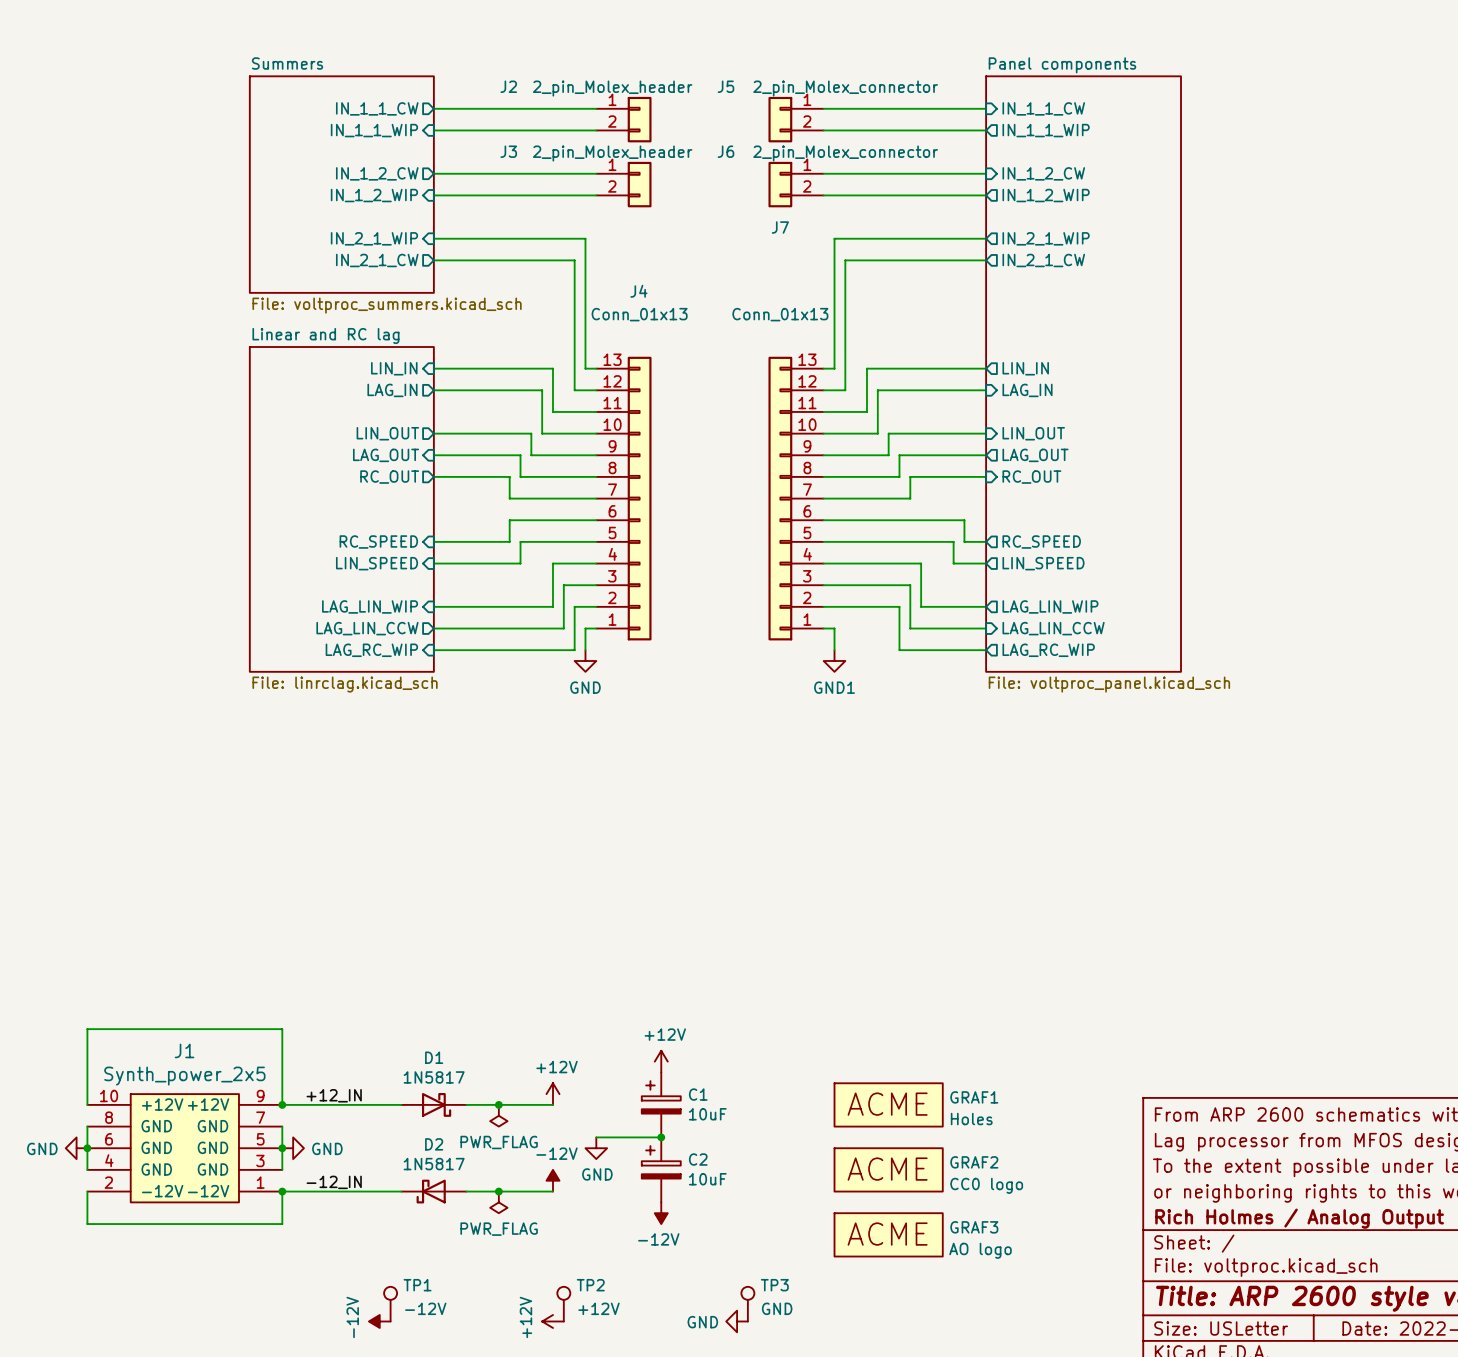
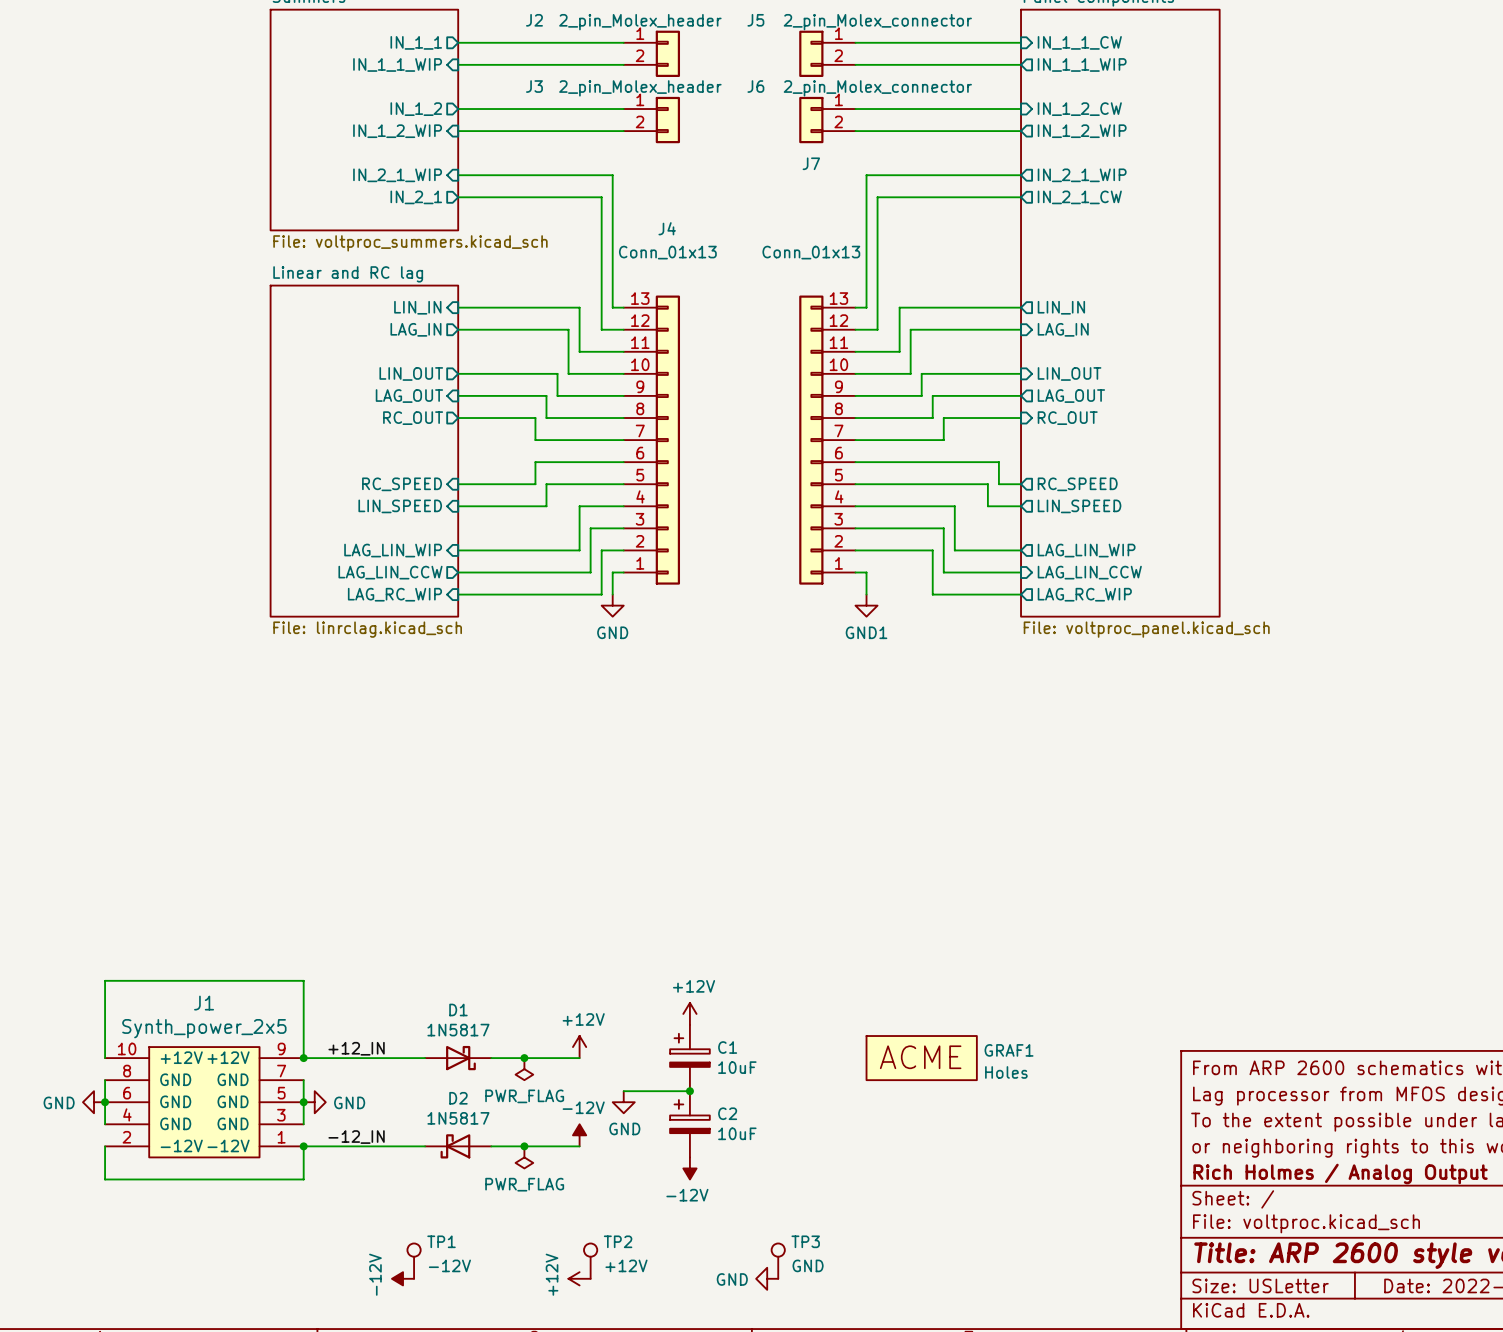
sheet pin: IN_1_1_CW (377, 108) -> IN_1_1 (416, 42)
sheet pin: IN_1_2_CW (377, 173) -> IN_1_2 (416, 109)
sheet pin: IN_2_1_CW (377, 260) -> IN_2_1 (416, 197)
GRAF2: CC0 logo (888, 1169) -> none
GRAF3: AO logo (888, 1234) -> none

